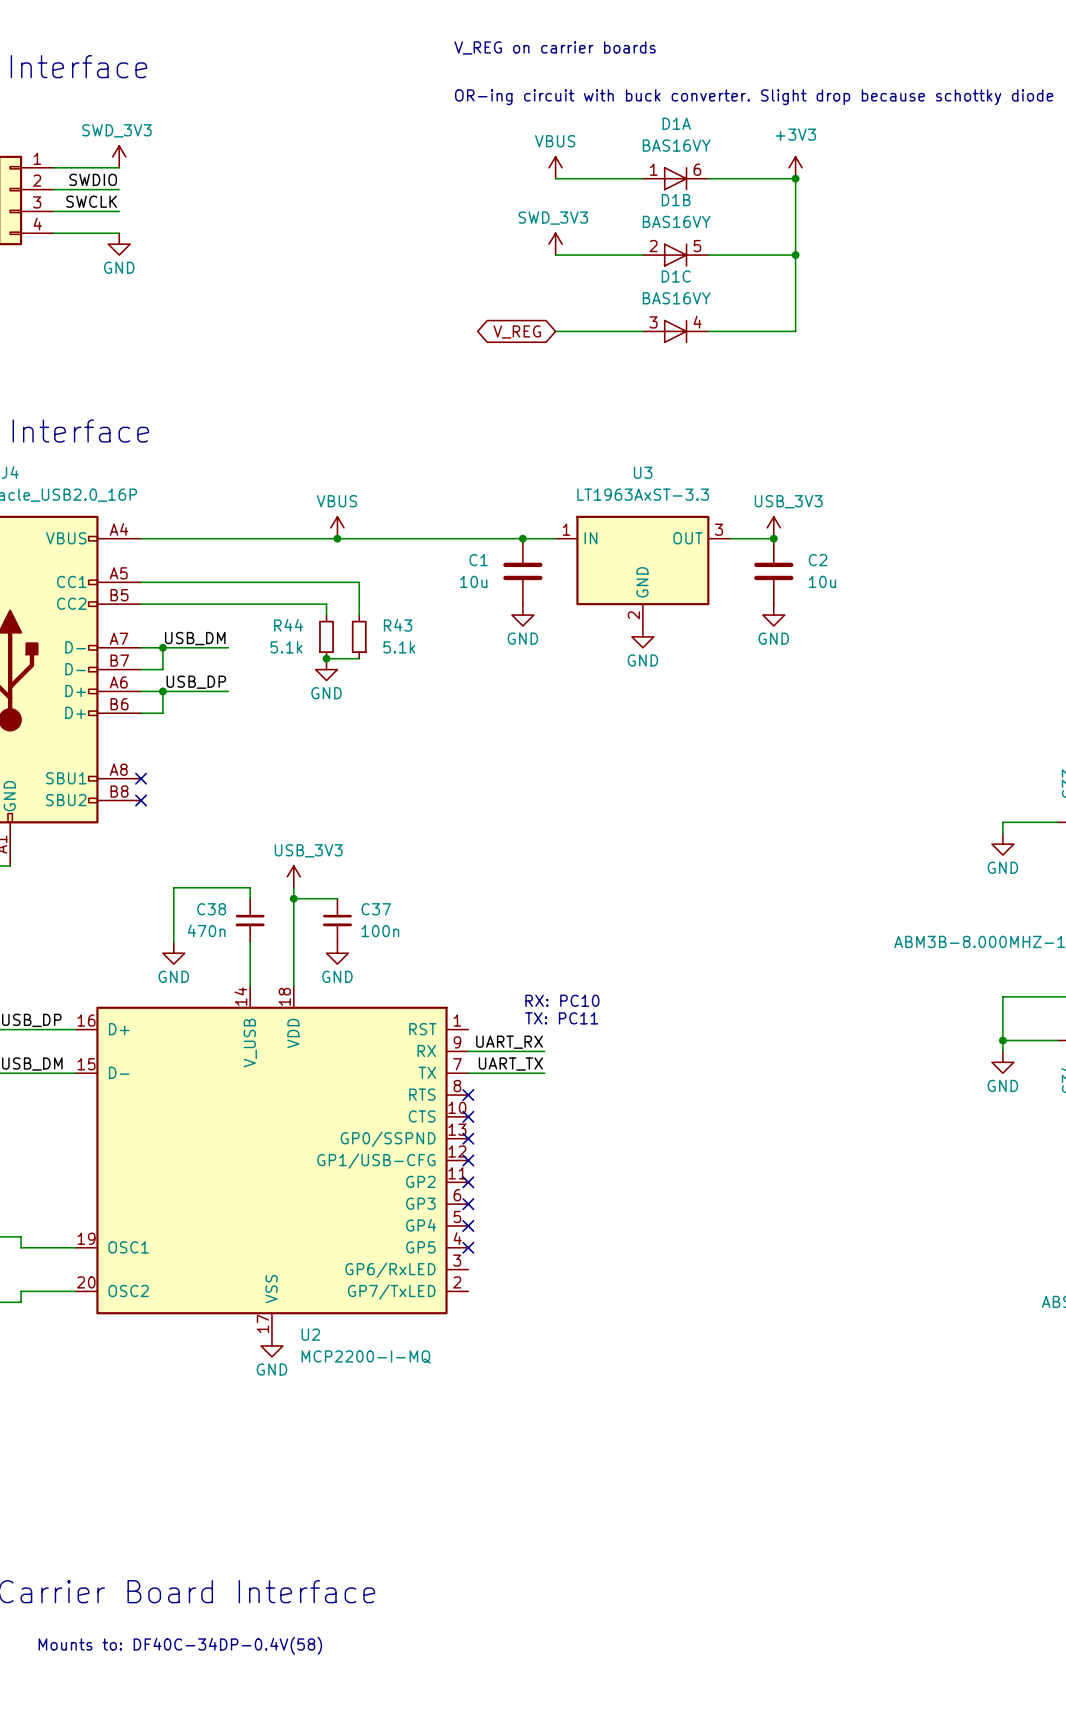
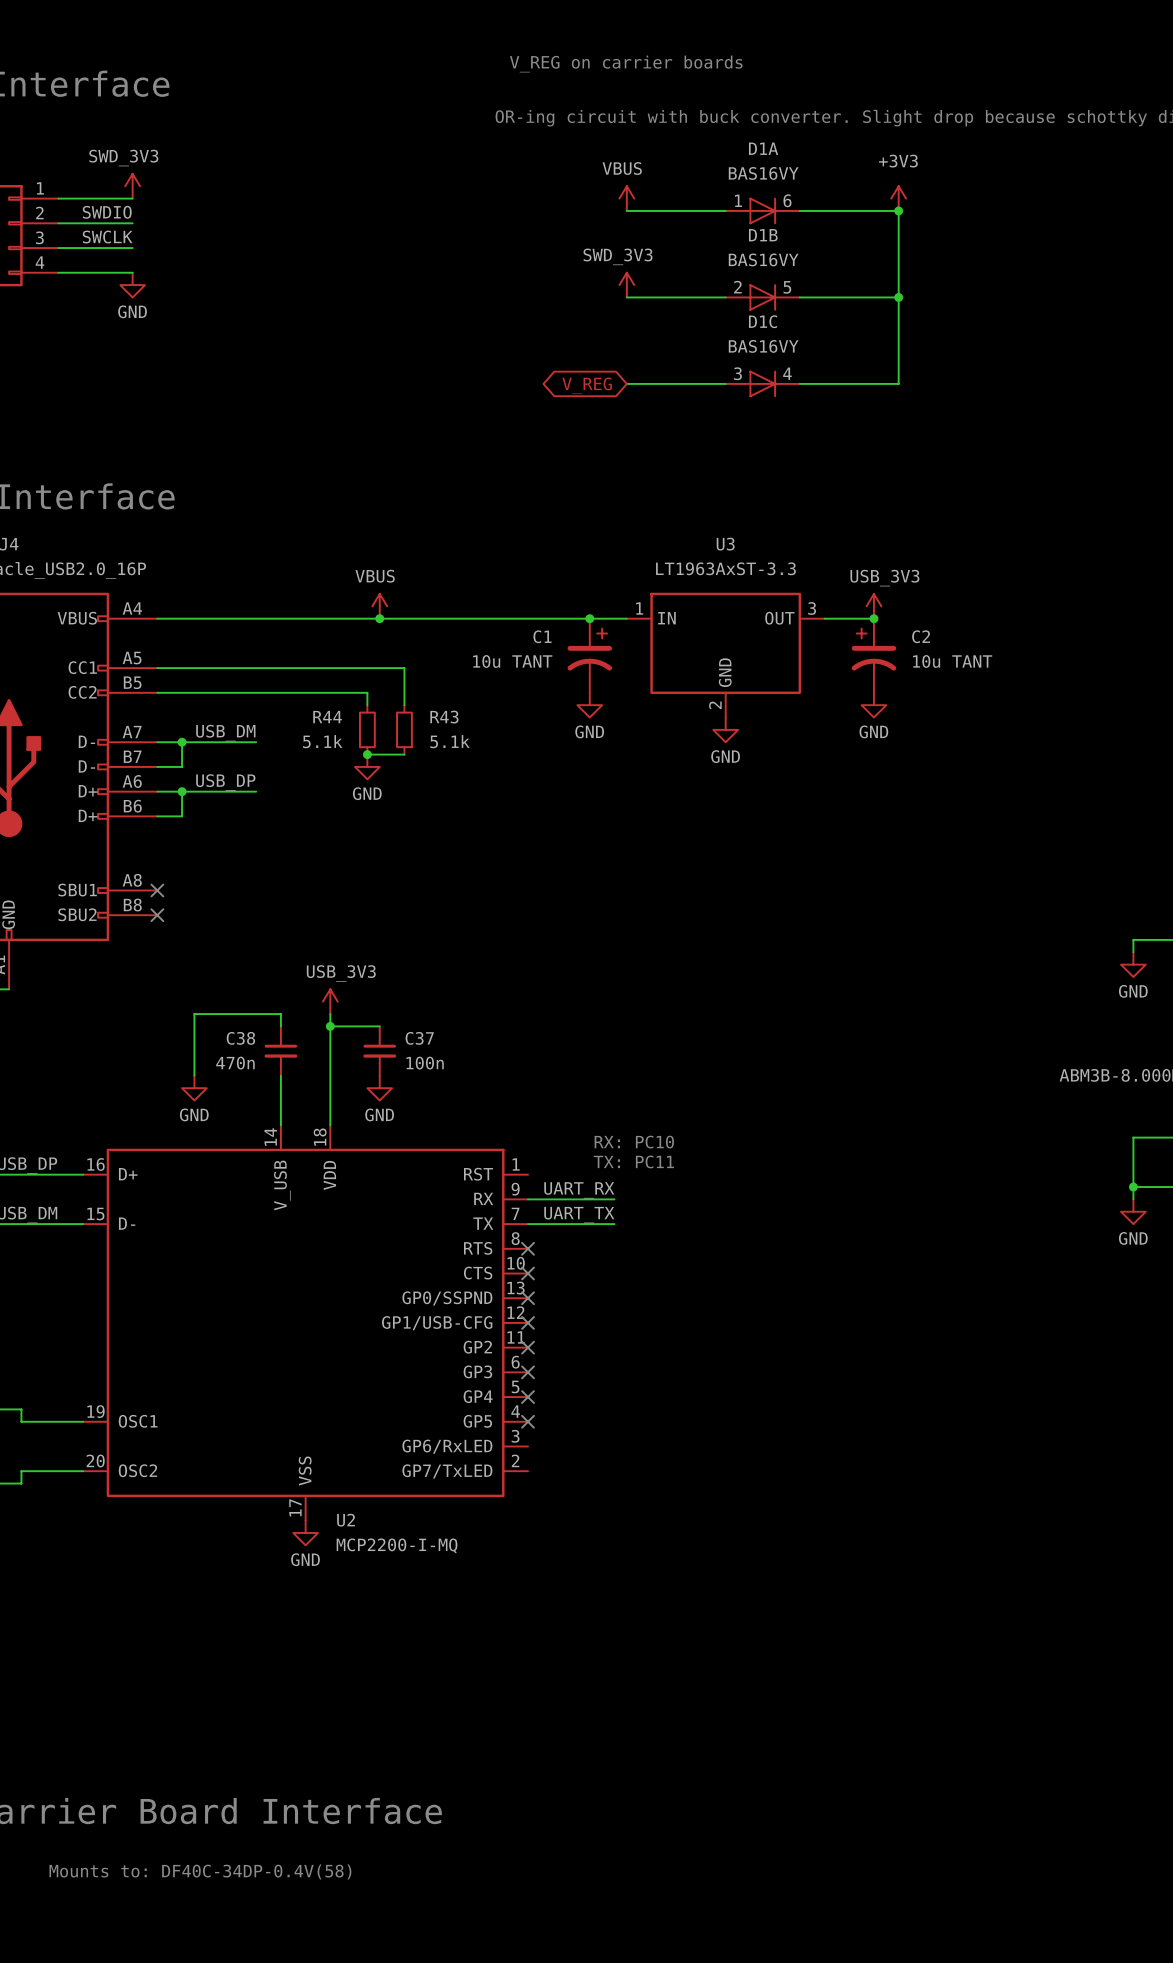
C1 symbol: [503, 538, 543, 605] -> [567, 618, 613, 693]
C2 symbol: [754, 538, 794, 605] -> [851, 618, 897, 693]
C1 value: 10u (473, 581) -> 10u TANT (512, 661)
C2 value: 10u (822, 581) -> 10u TANT (952, 661)

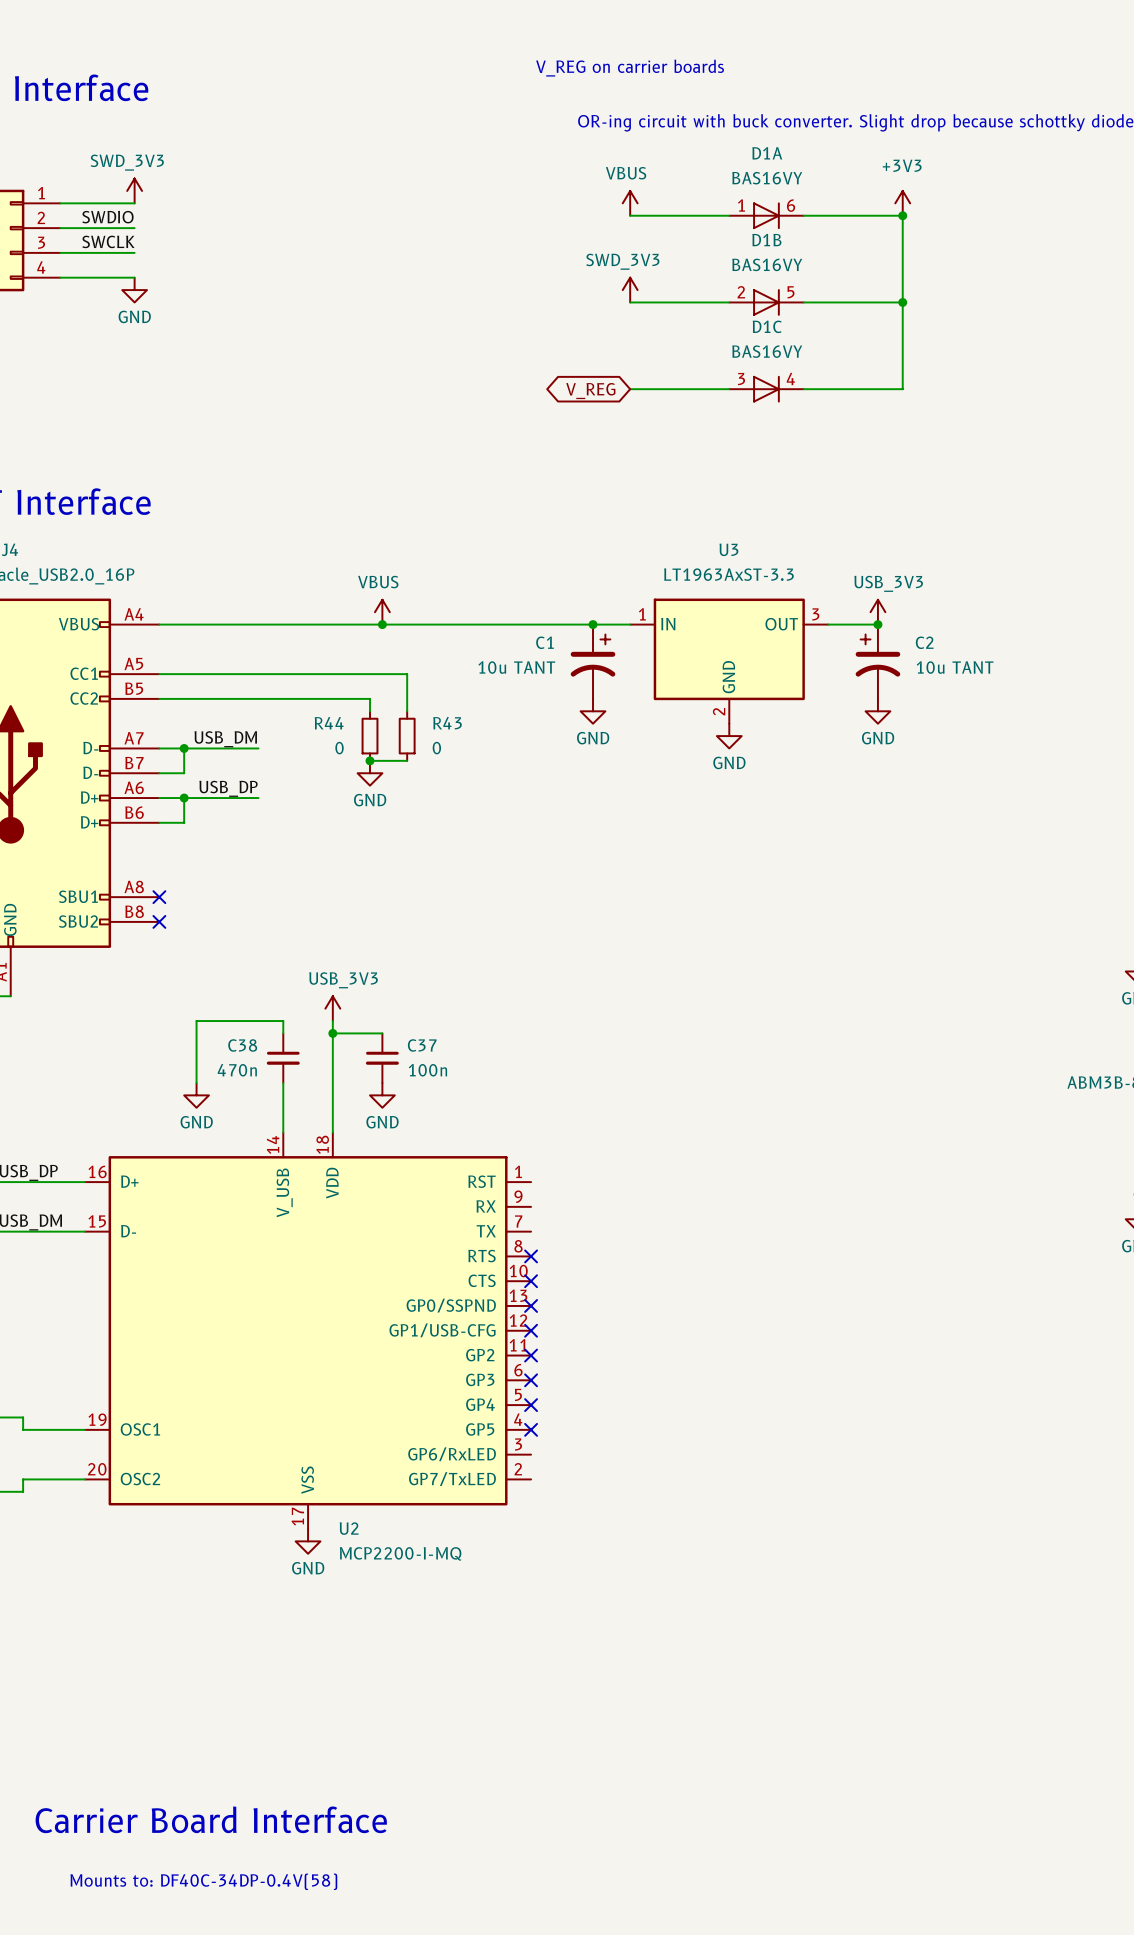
R44 value: 5.1k (322, 741) -> 0 (339, 748)
R43 value: 5.1k (450, 741) -> 0 (436, 748)
text: RX: PC10 (634, 1142) -> none
text: TX: PC11 (633, 1161) -> none
label: UART_RX (579, 1190) -> none
wire: (528, 1199) (614, 1199) -> none
label: UART_TX (579, 1215) -> none
wire: (528, 1224) (614, 1224) -> none

